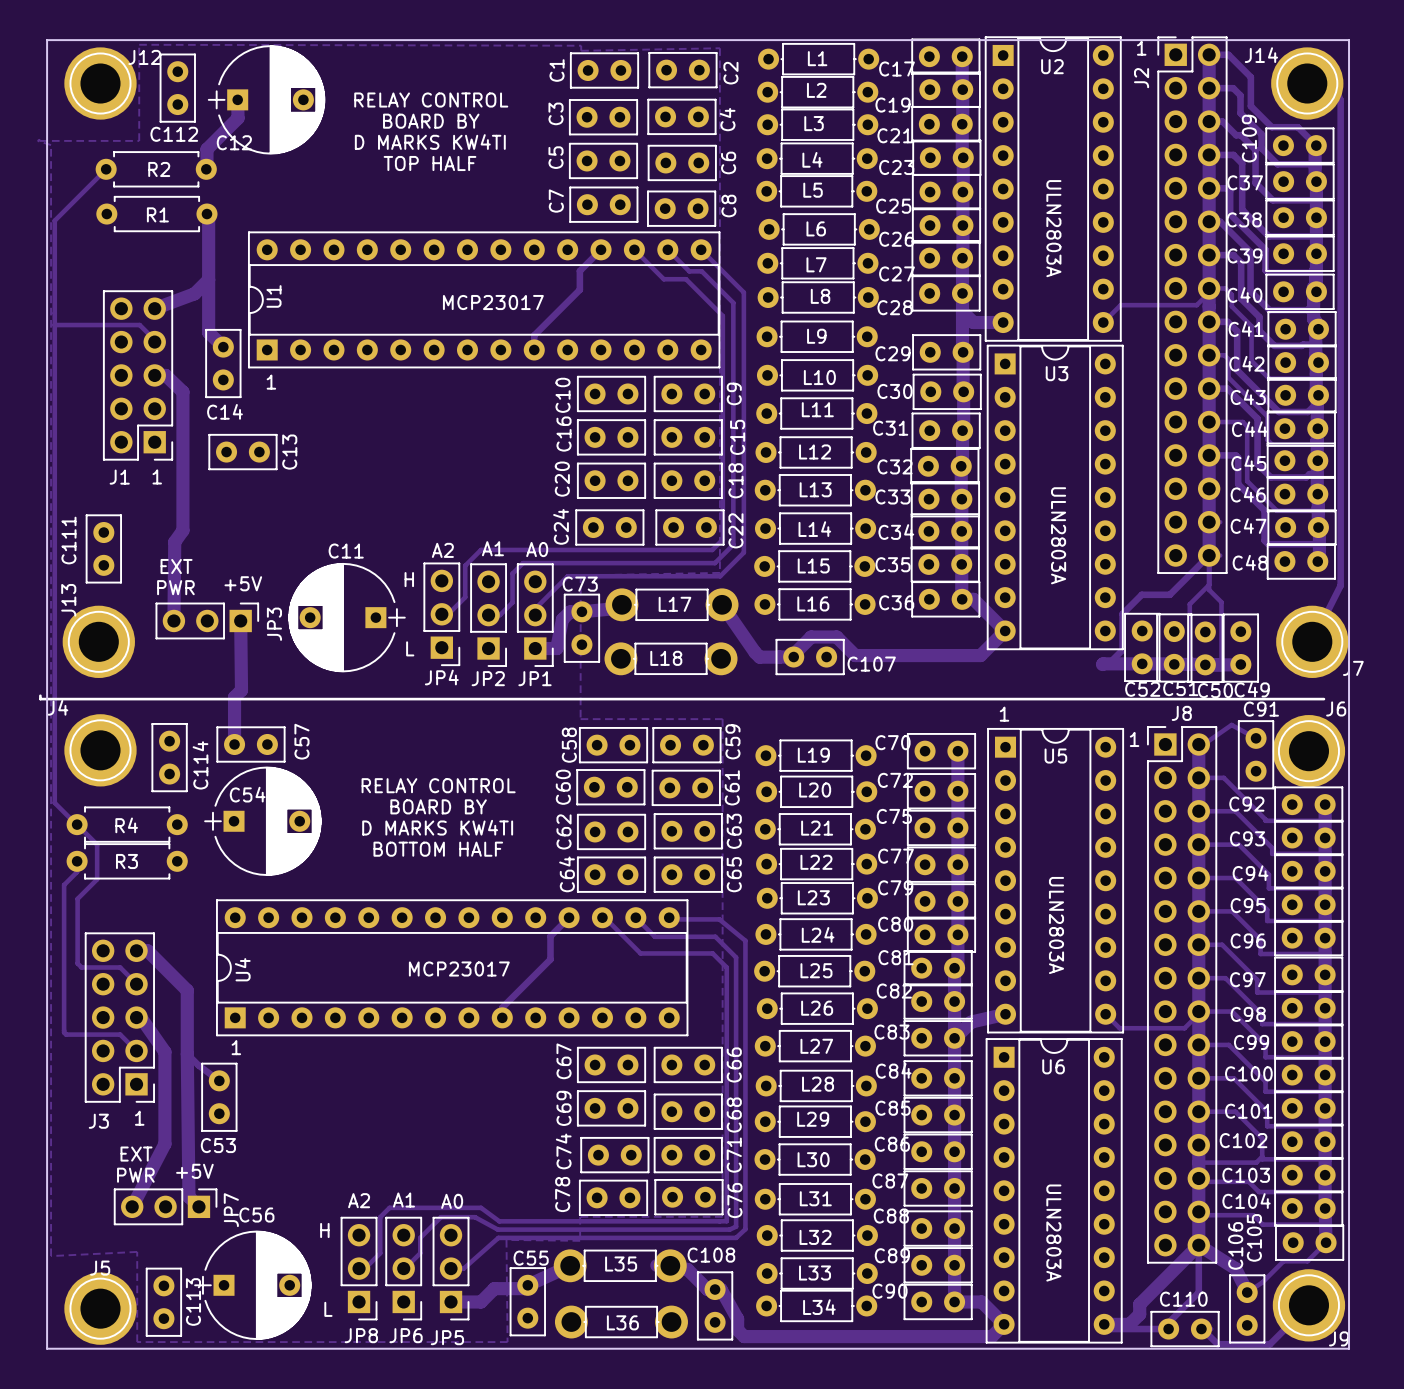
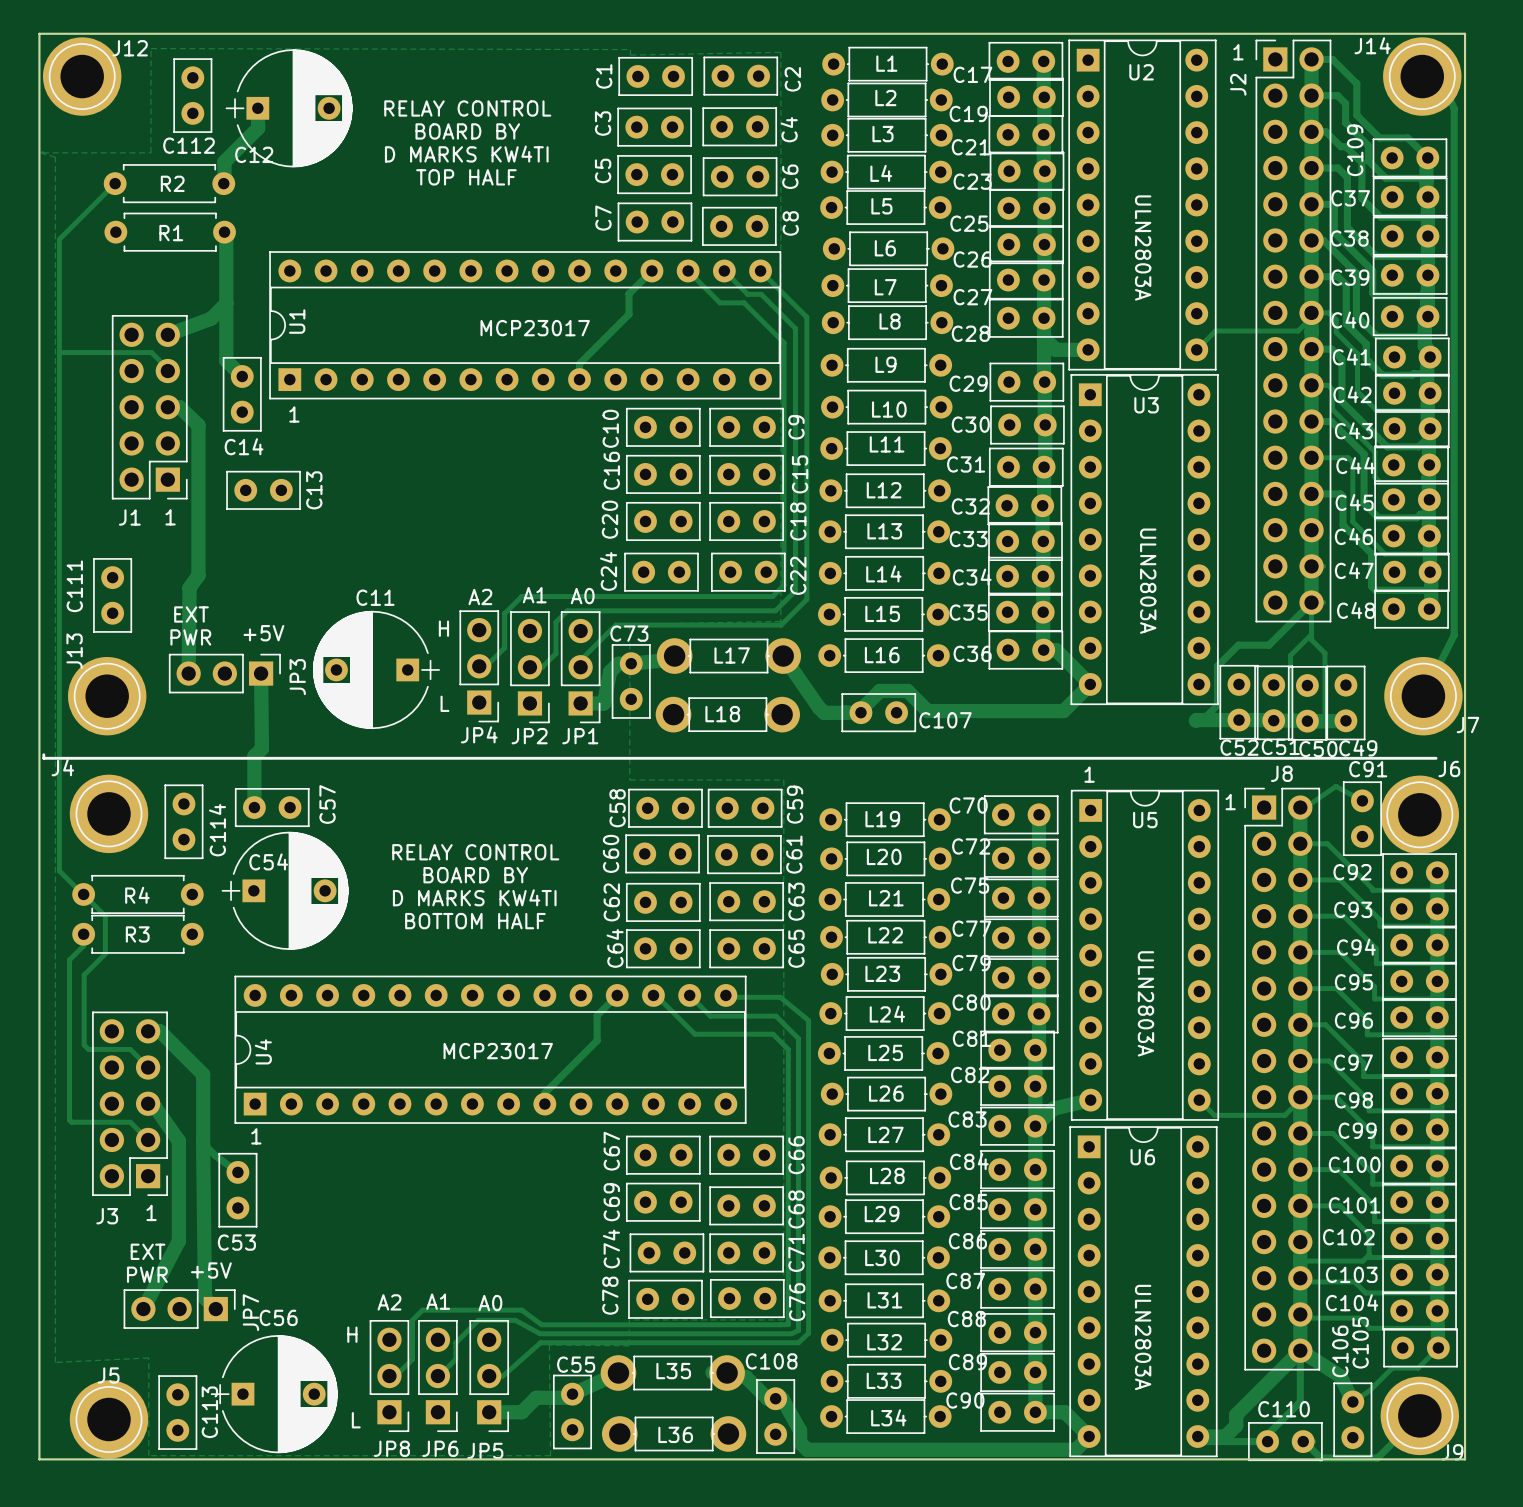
board edge: (47, 40) (47, 1348) (1349, 1348) (1349, 40) (47, 40) -> (39, 33) (39, 1459) (1465, 1459) (1465, 33) (39, 33)
J12 position: (100, 83) -> (82, 76)
J14 position: (1307, 83) -> (1422, 76)

